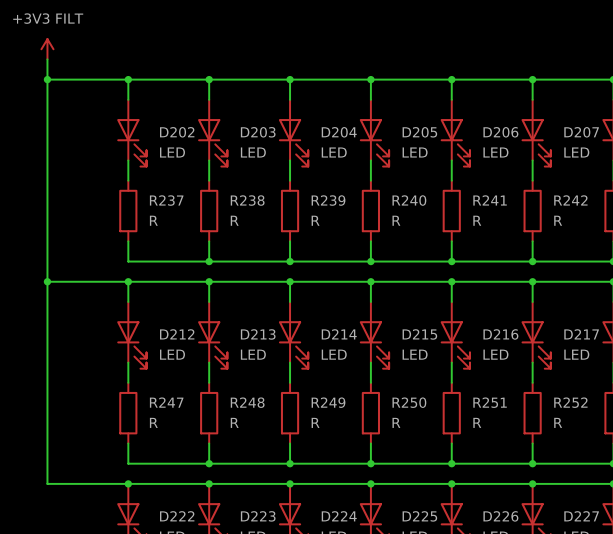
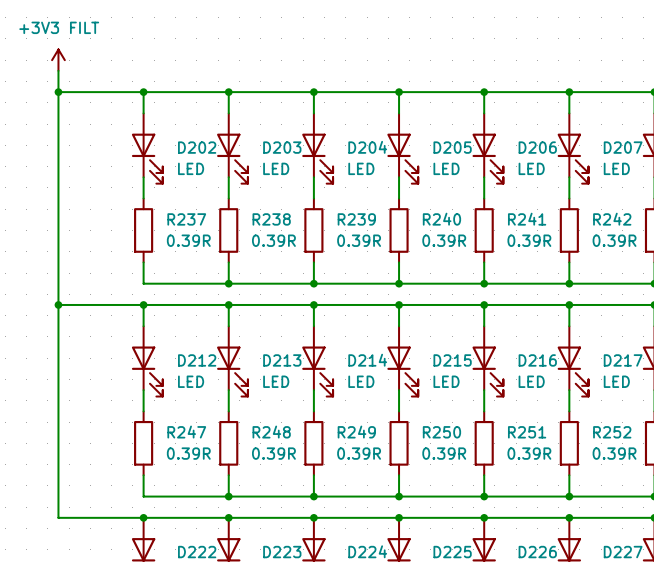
R237 value: R (153, 220) -> 0.39R (188, 240)
R238 value: R (234, 220) -> 0.39R (273, 240)
R239 value: R (315, 220) -> 0.39R (359, 240)
R240 value: R (396, 220) -> 0.39R (444, 240)
R241 value: R (477, 220) -> 0.39R (529, 240)
R242 value: R (558, 220) -> 0.39R (614, 240)
R247 value: R (153, 422) -> 0.39R (188, 453)
R248 value: R (234, 422) -> 0.39R (273, 453)
R249 value: R (315, 422) -> 0.39R (359, 453)
R250 value: R (396, 422) -> 0.39R (444, 453)
R251 value: R (477, 422) -> 0.39R (529, 453)
R252 value: R (558, 422) -> 0.39R (614, 453)

